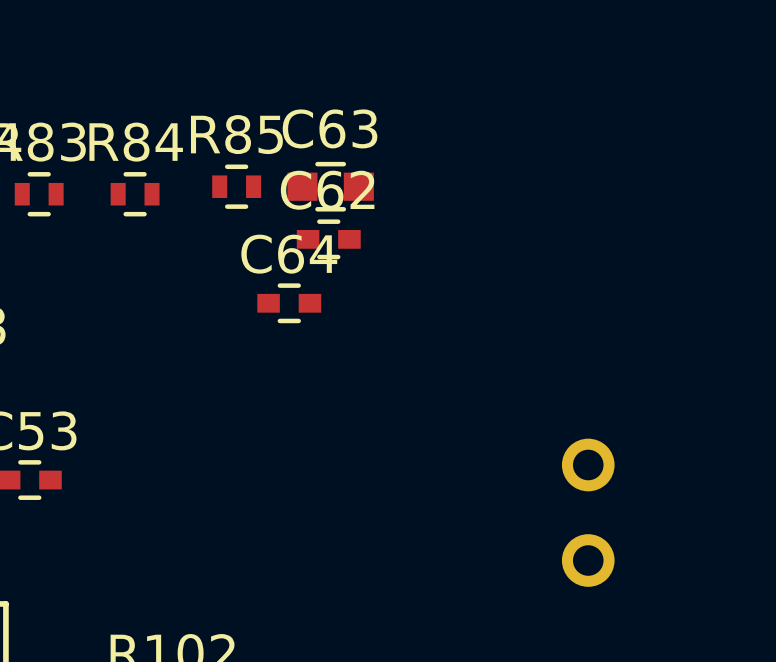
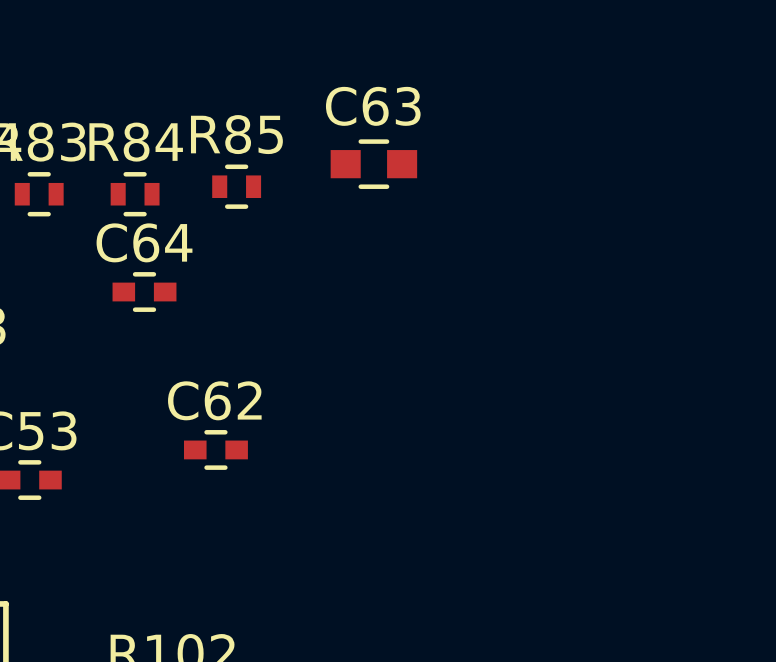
C63 position: (330, 186) -> (373, 164)
C62 position: (328, 239) -> (215, 449)
C64 position: (289, 303) -> (144, 292)
part: (588, 512) -> none

